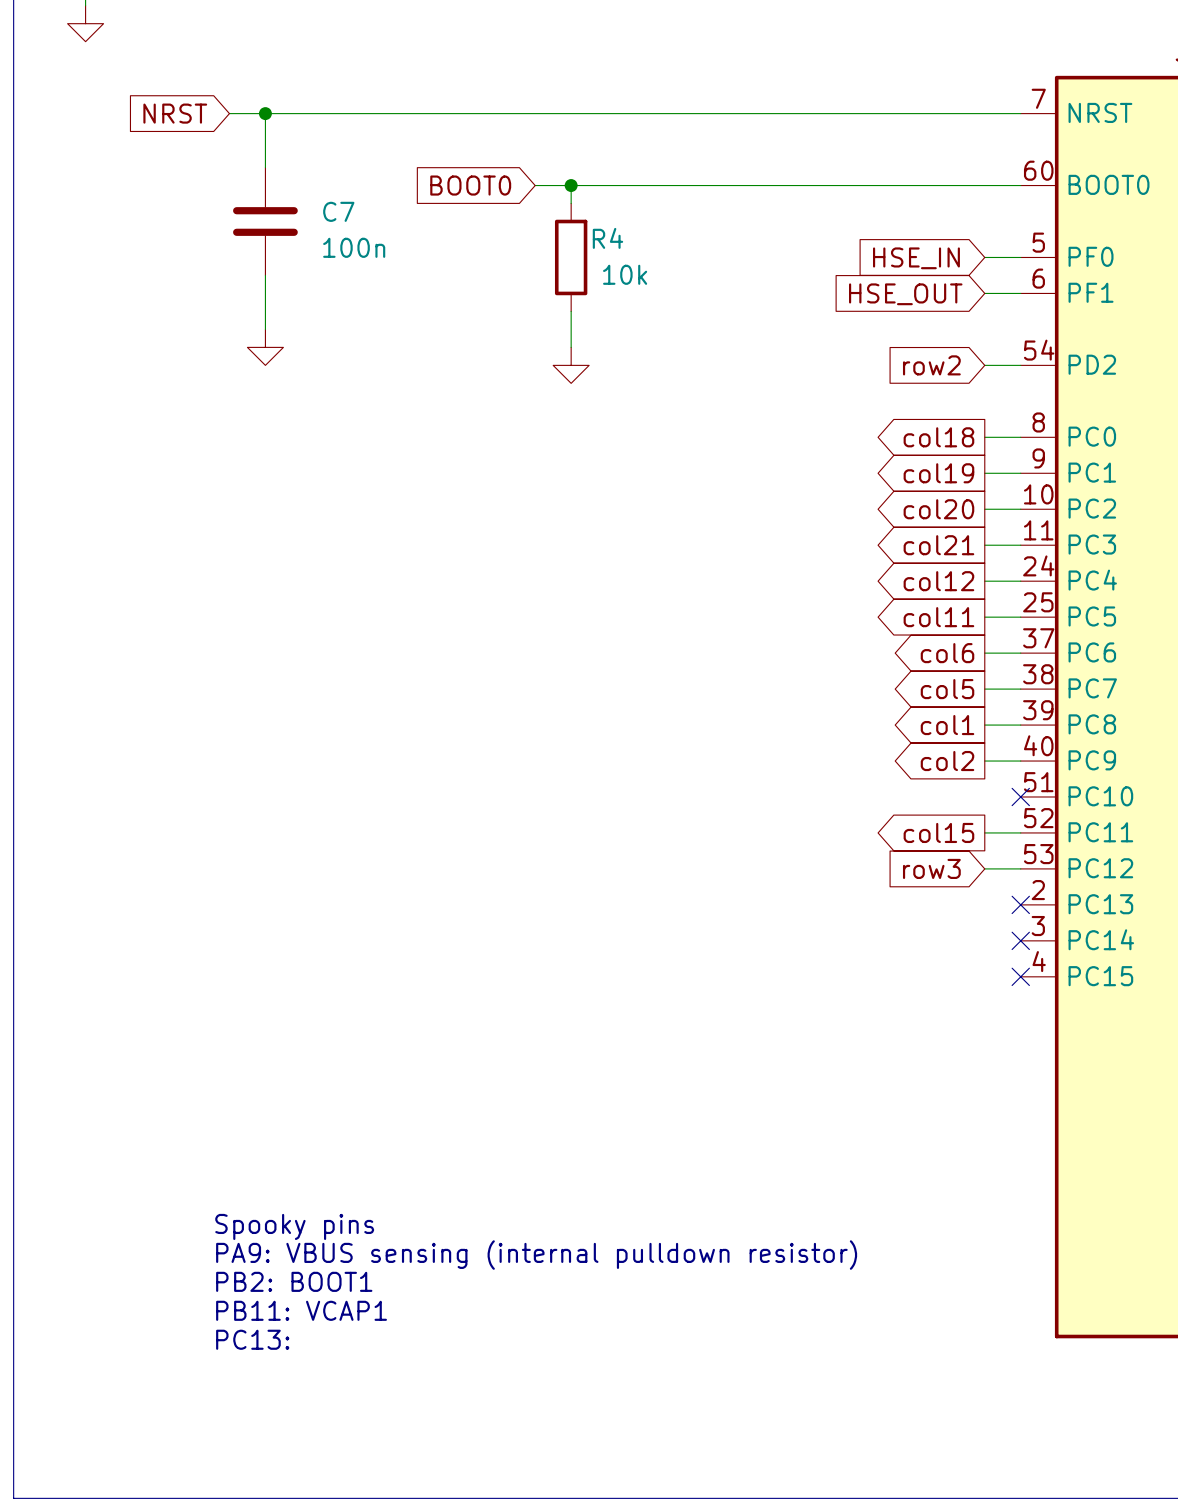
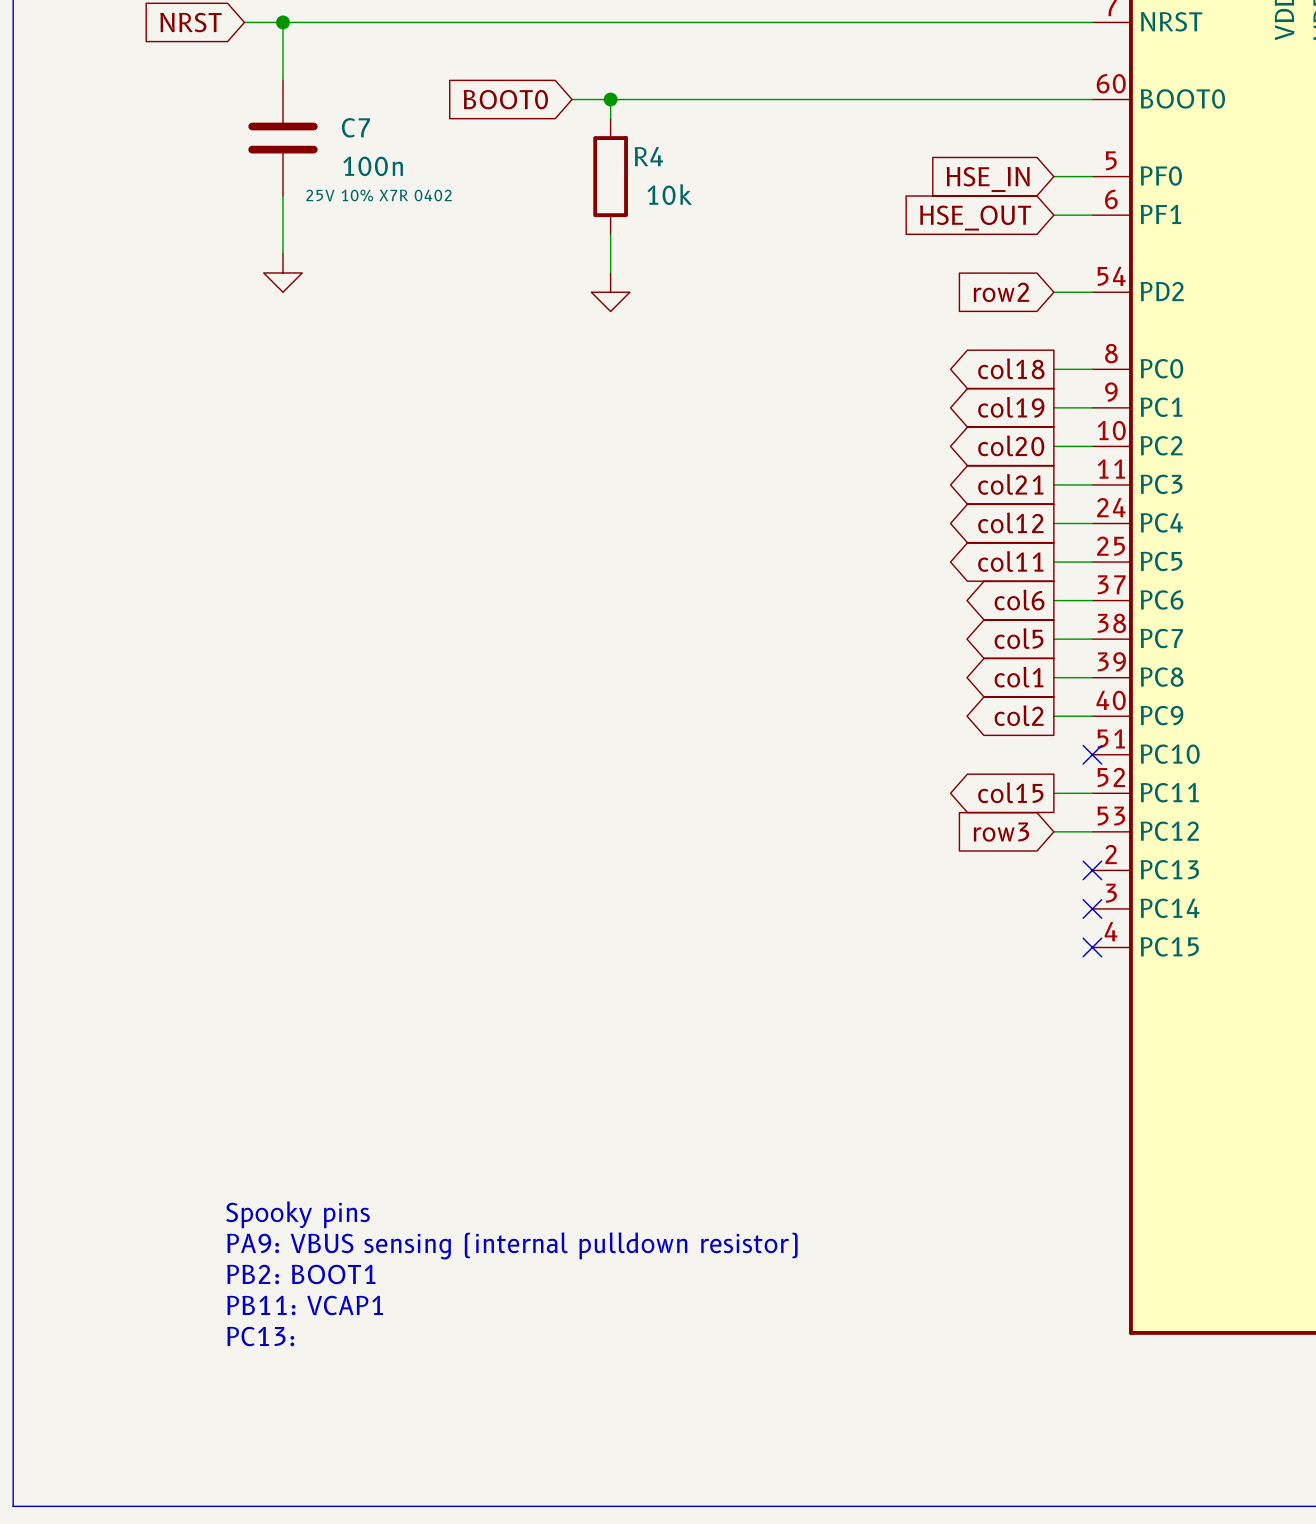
C7 text: none -> 25V 10% X7R 0402 (379, 195)

